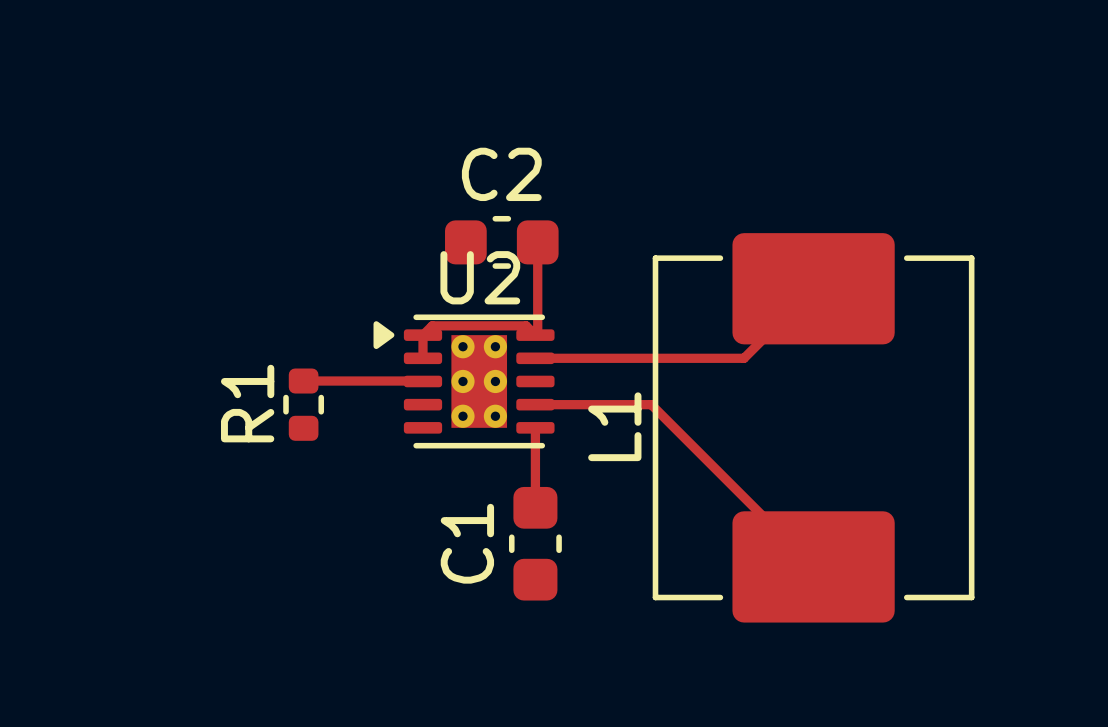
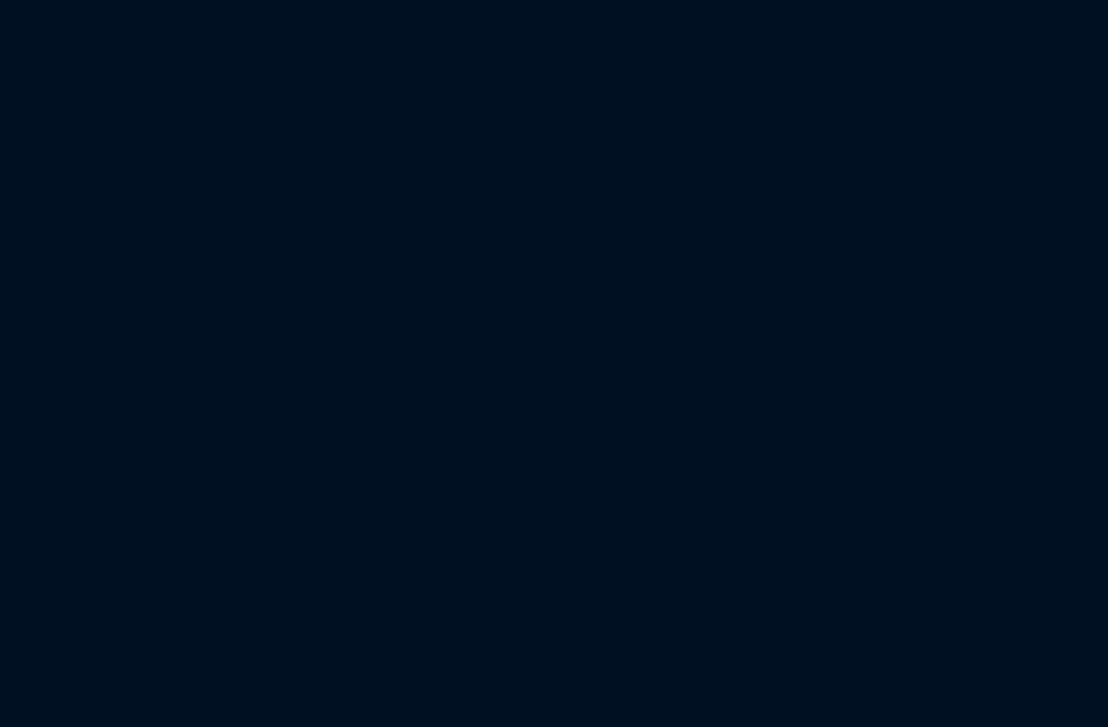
C2: (501, 242) -> none
track: (537, 242) (537, 332) (535, 335) (526, 325) (432, 325) (422, 335) (422, 358) -> none
track: (813, 288) (744, 358) (535, 358) -> none
track: (303, 381) (422, 381) -> none
U2: (464, 381) -> none
R1: (303, 404) -> none
track: (535, 404) (651, 404) (813, 566) -> none
track: (535, 427) (535, 507) -> none
L1: (813, 427) -> none
C1: (535, 543) -> none

